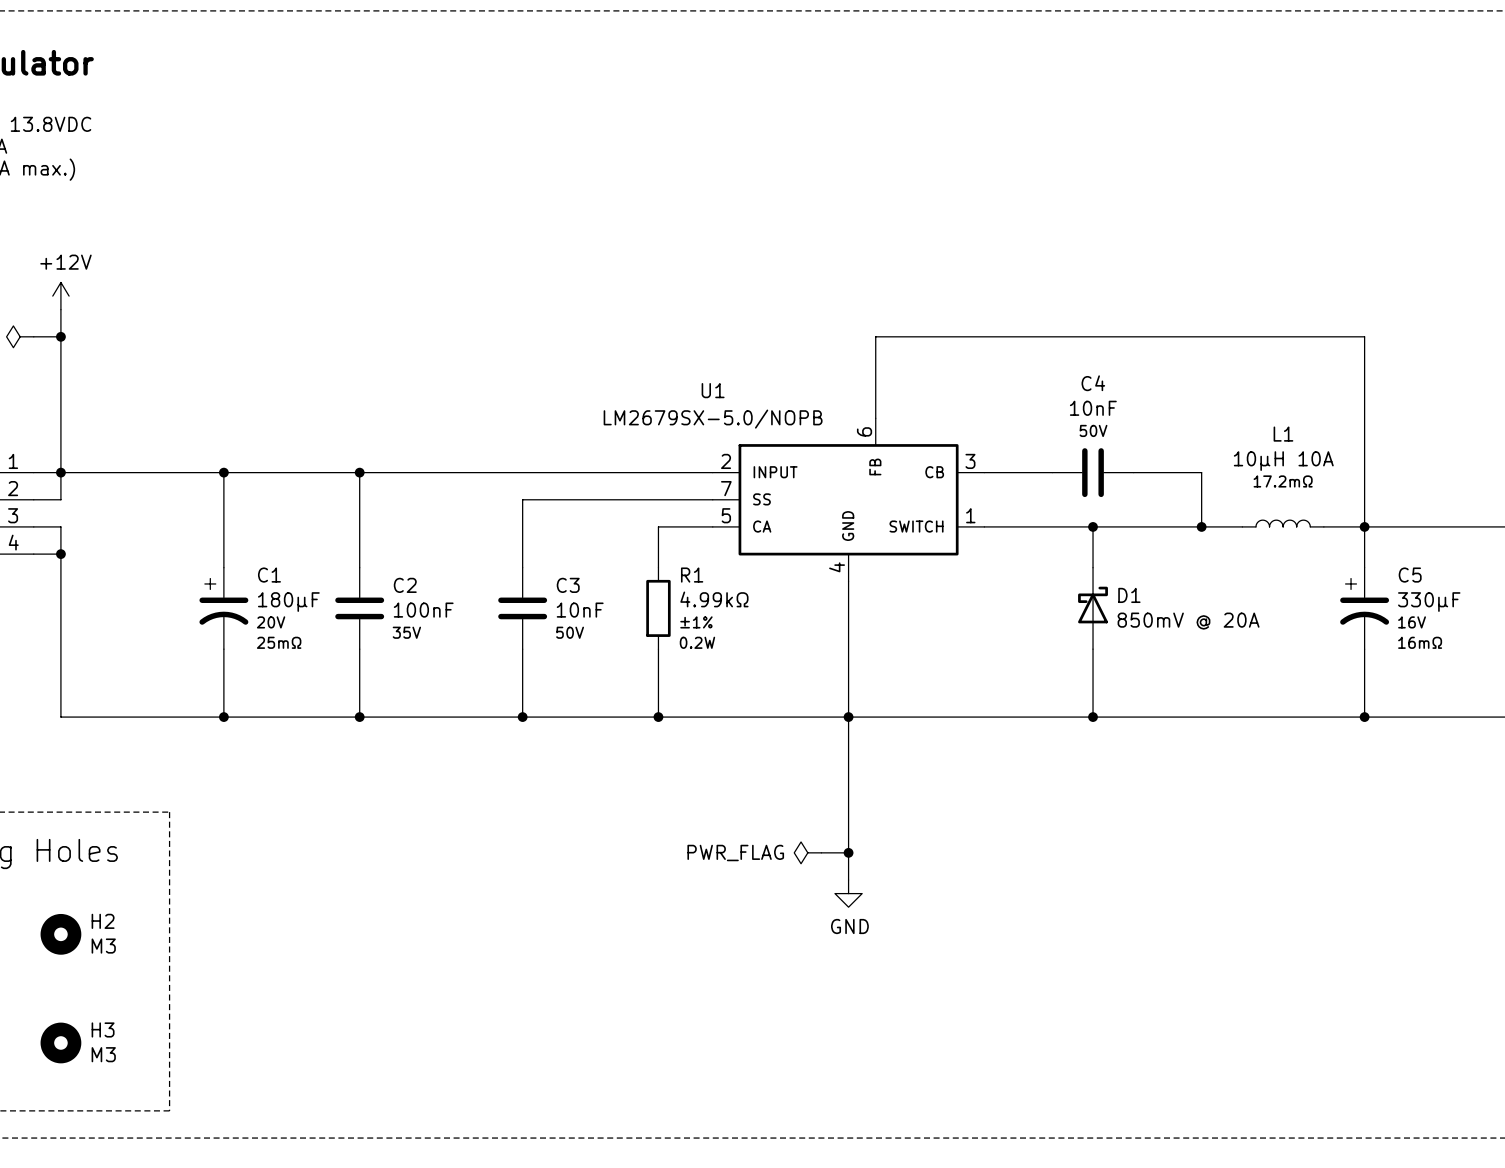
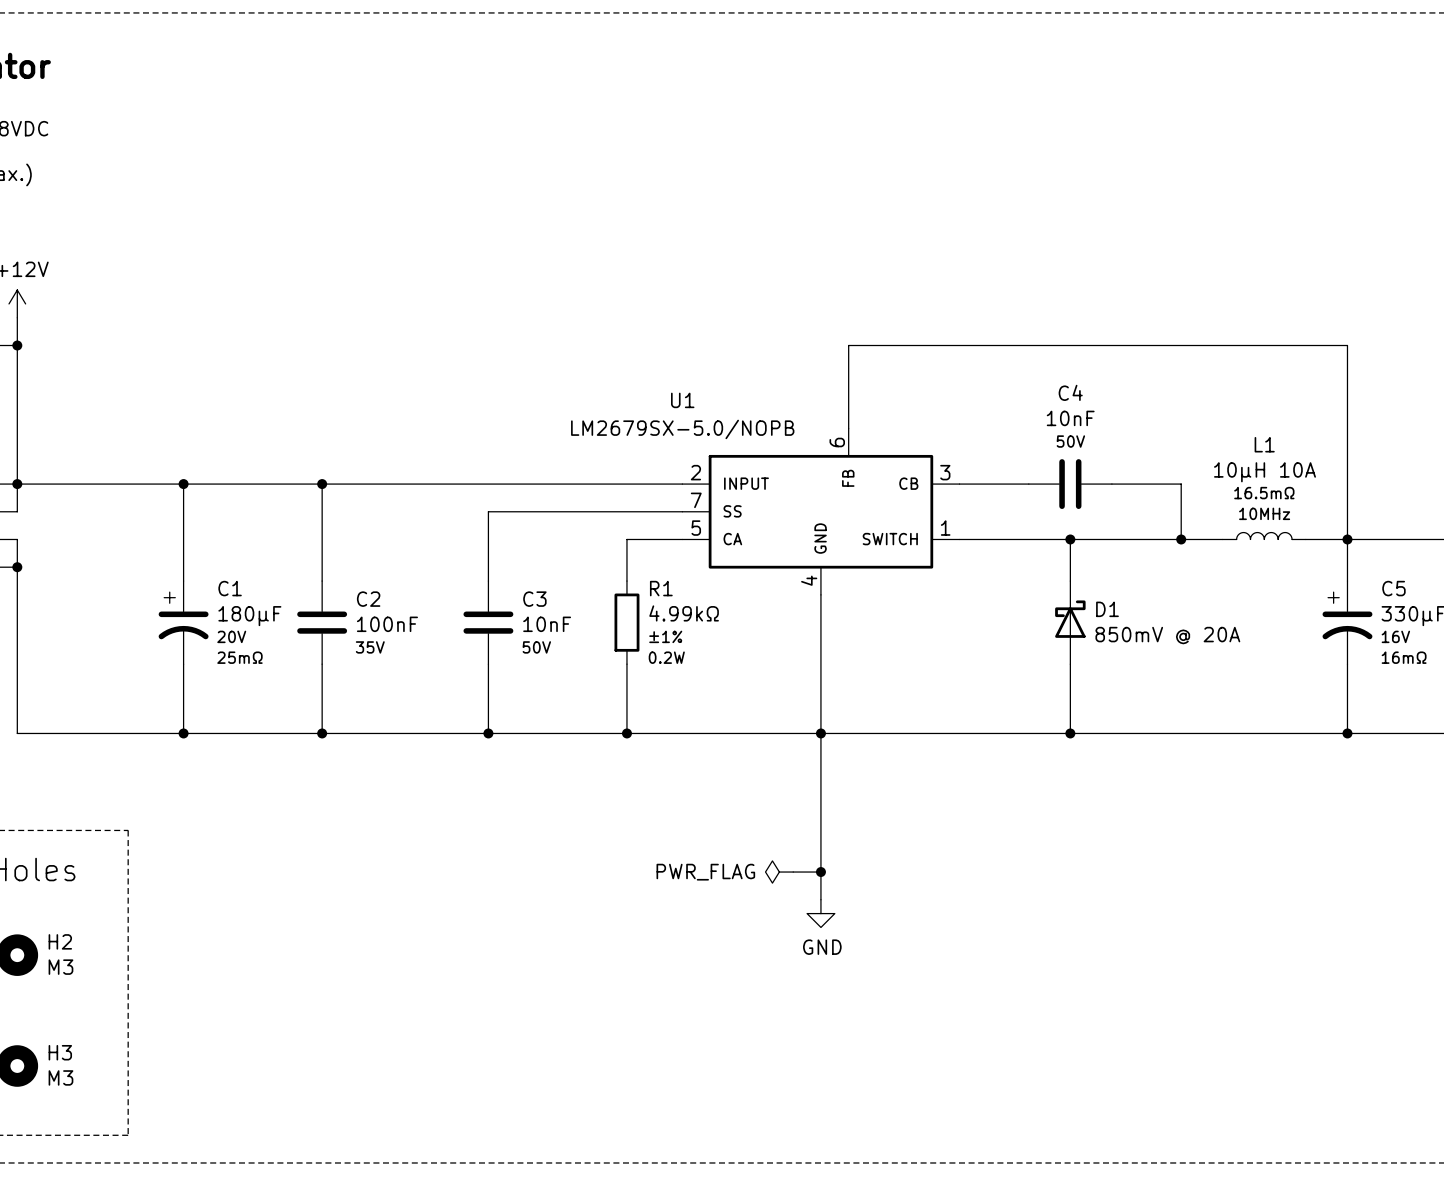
L1 text: 17.2mΩ (1283, 481) -> 16.5mΩ (1264, 493)
L1 text: none -> 10MHz (1264, 513)

